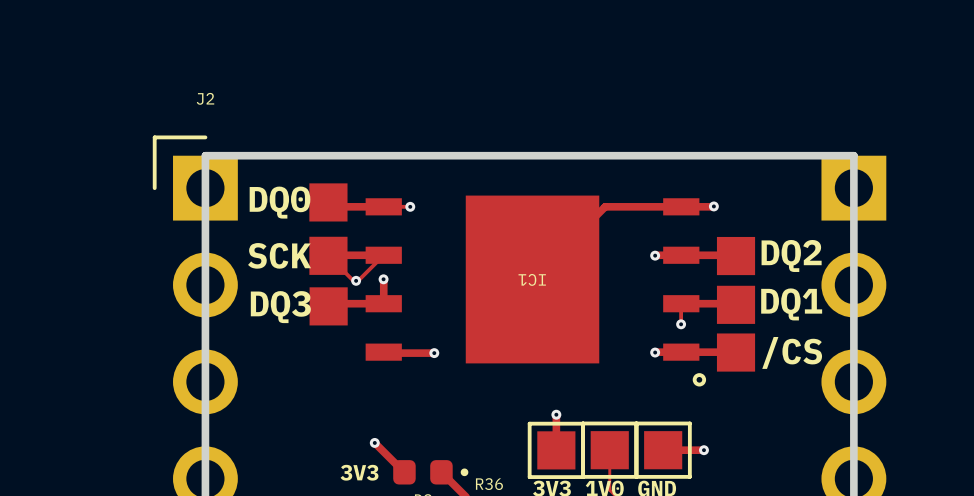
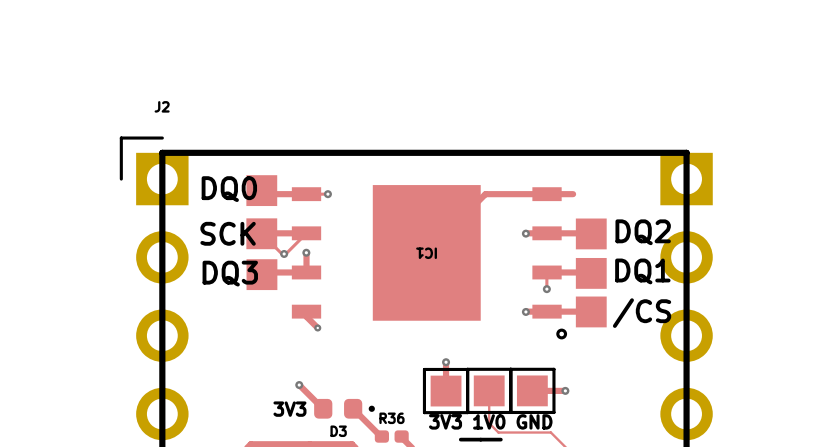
via: (713, 206) -> none
track: (383, 352) (434, 353) -> (306, 311) (306, 316) (317, 327)
via: (434, 353) -> none
via: none -> (317, 327)

